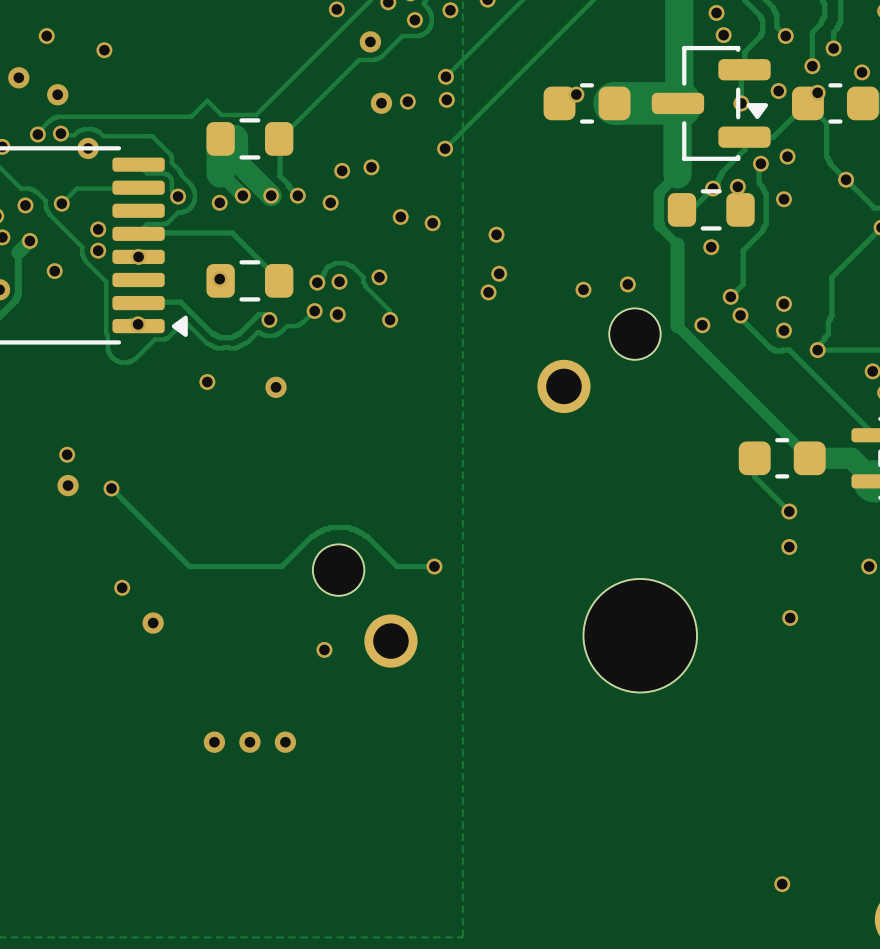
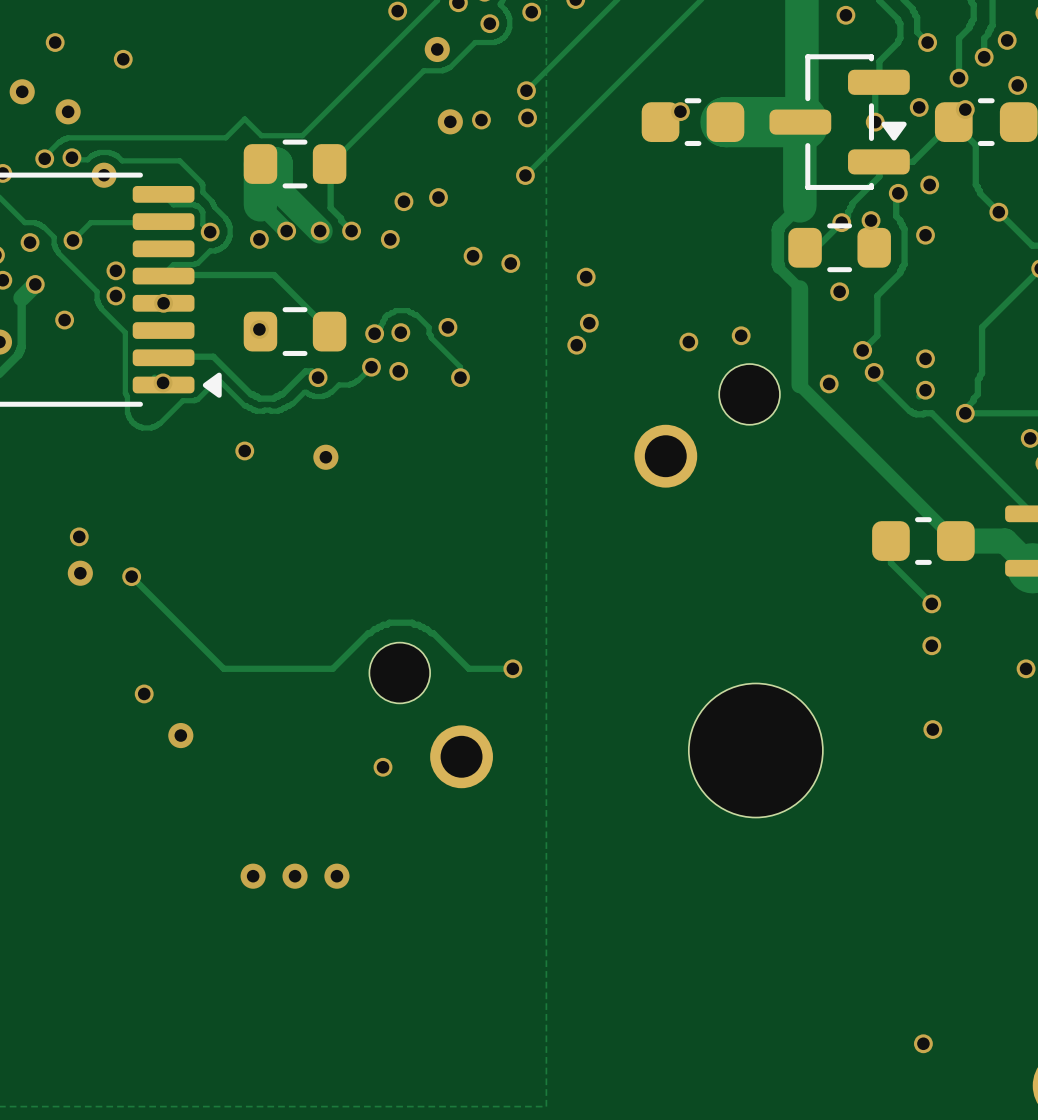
via: none -> (1007, 40)
via: (723, 35) -> none

